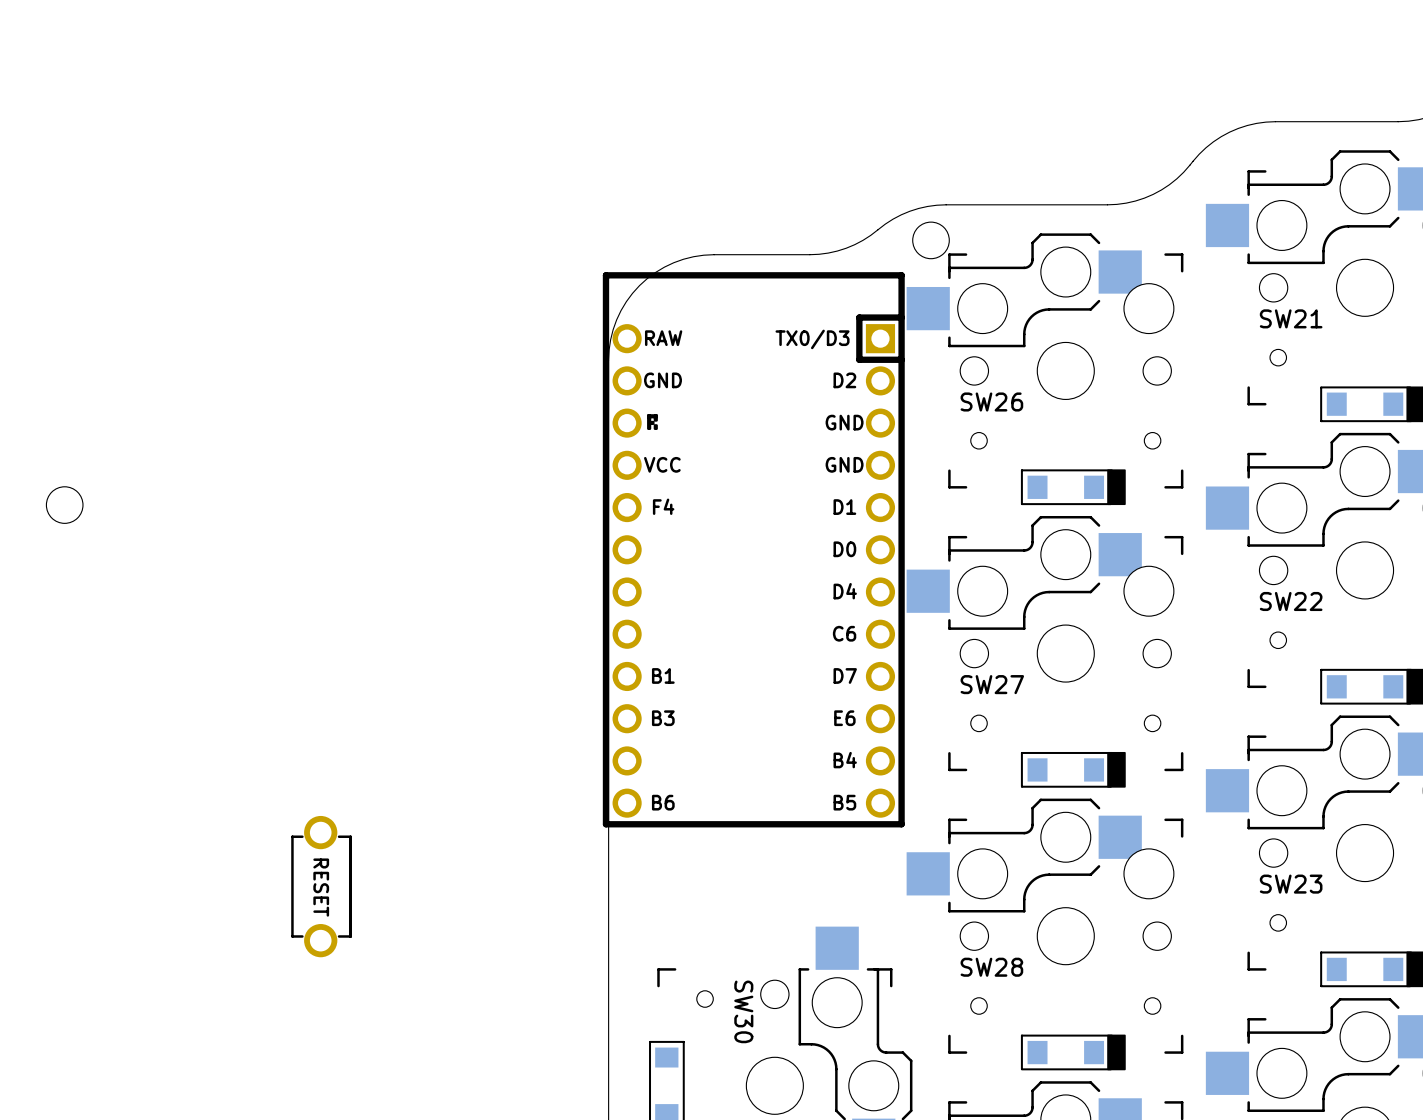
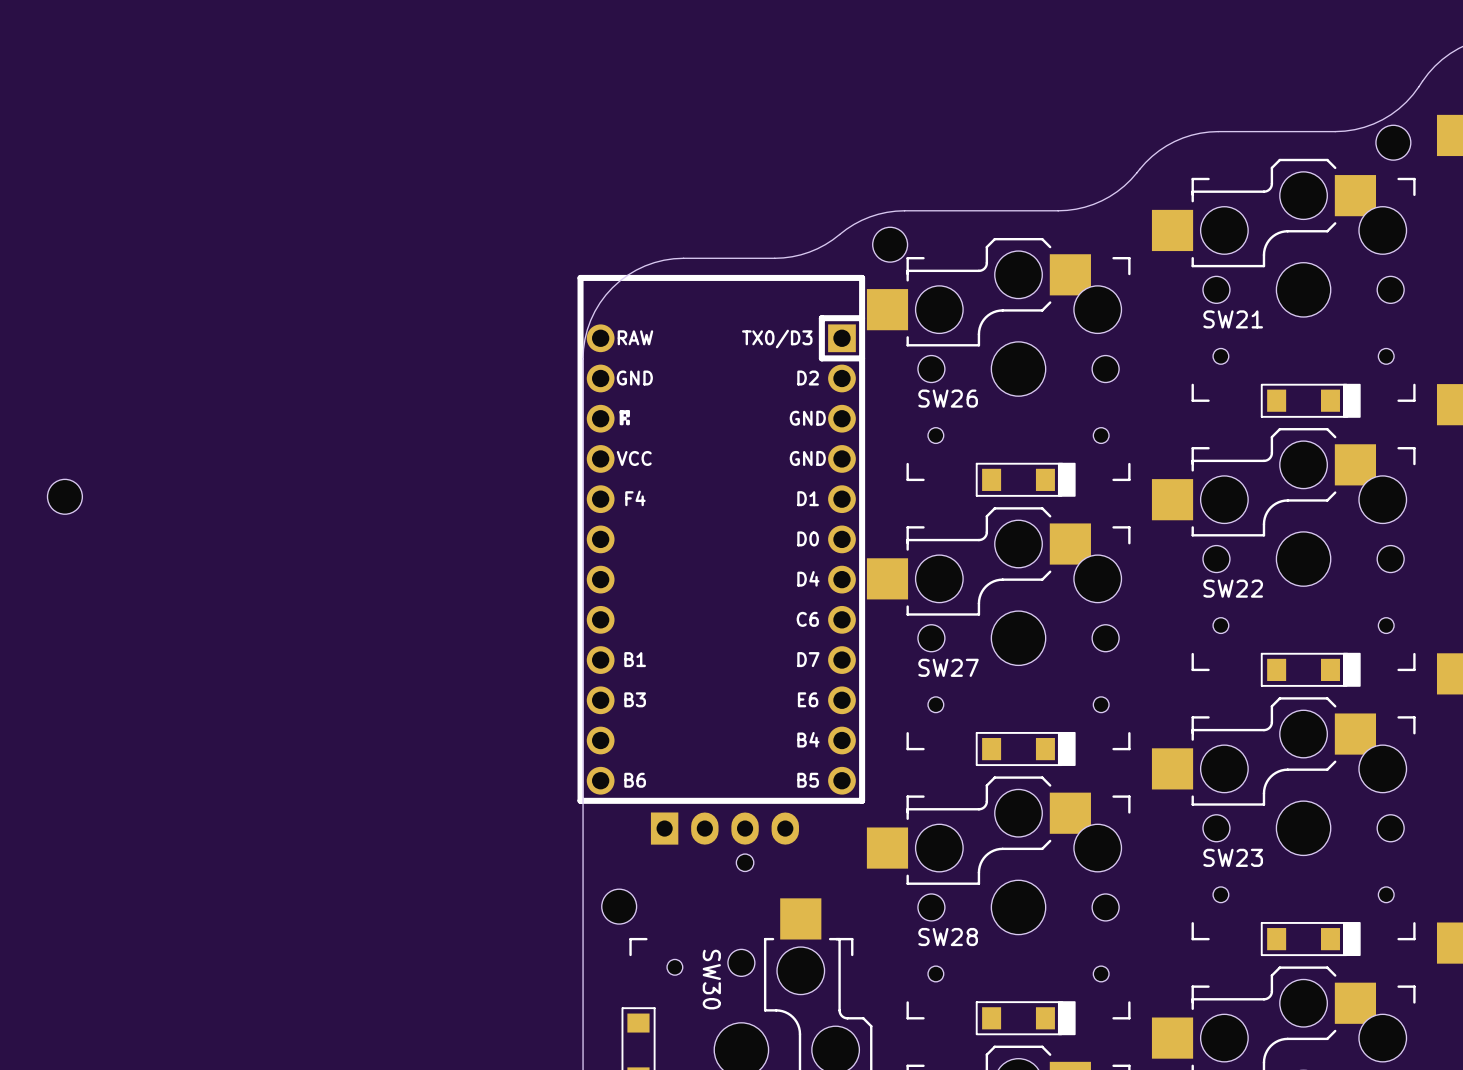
part: none -> (724, 841)
part: (321, 886) -> none
part: none -> (619, 906)

